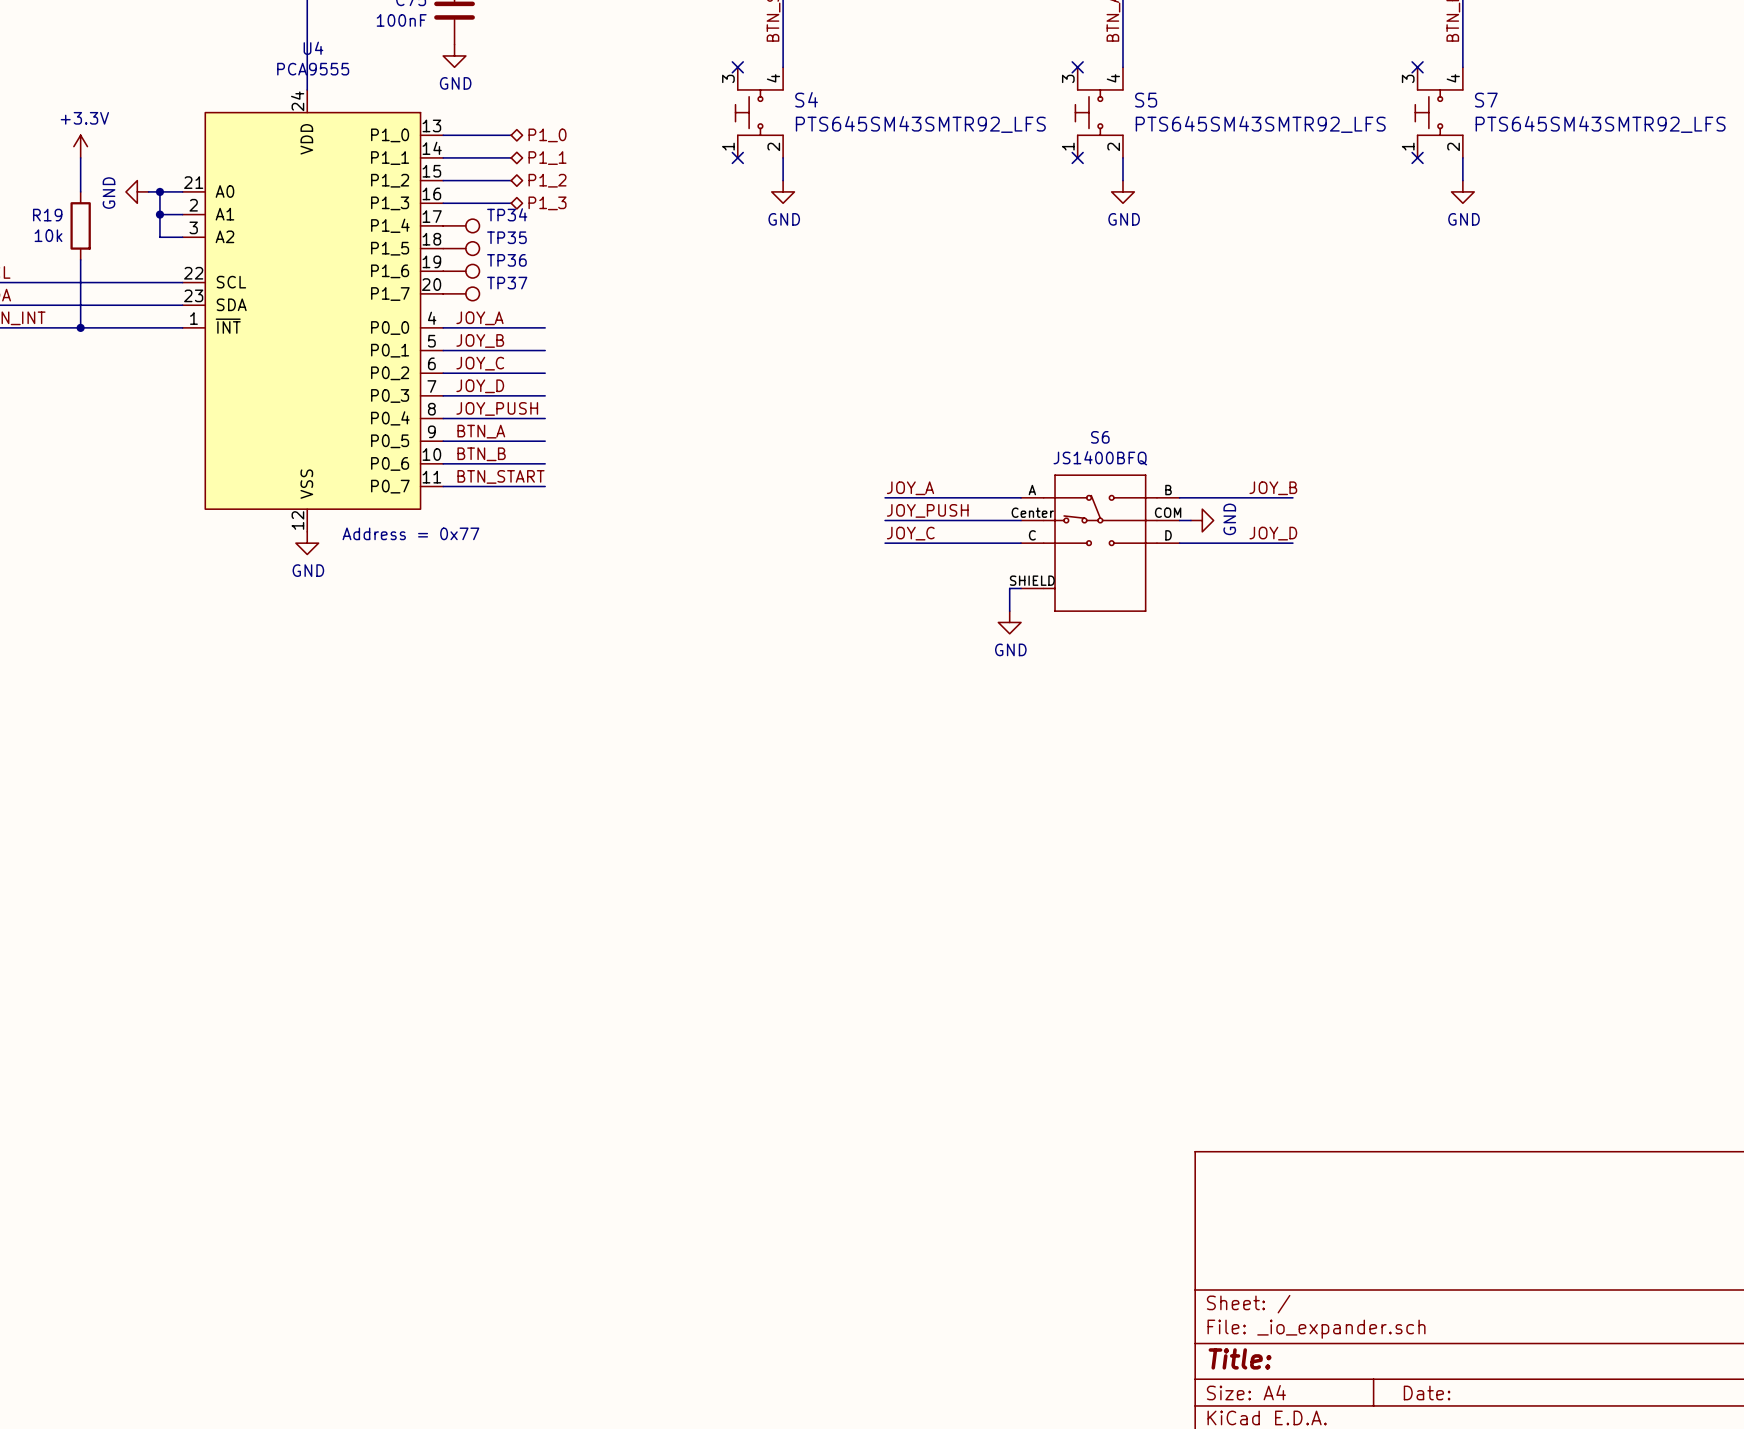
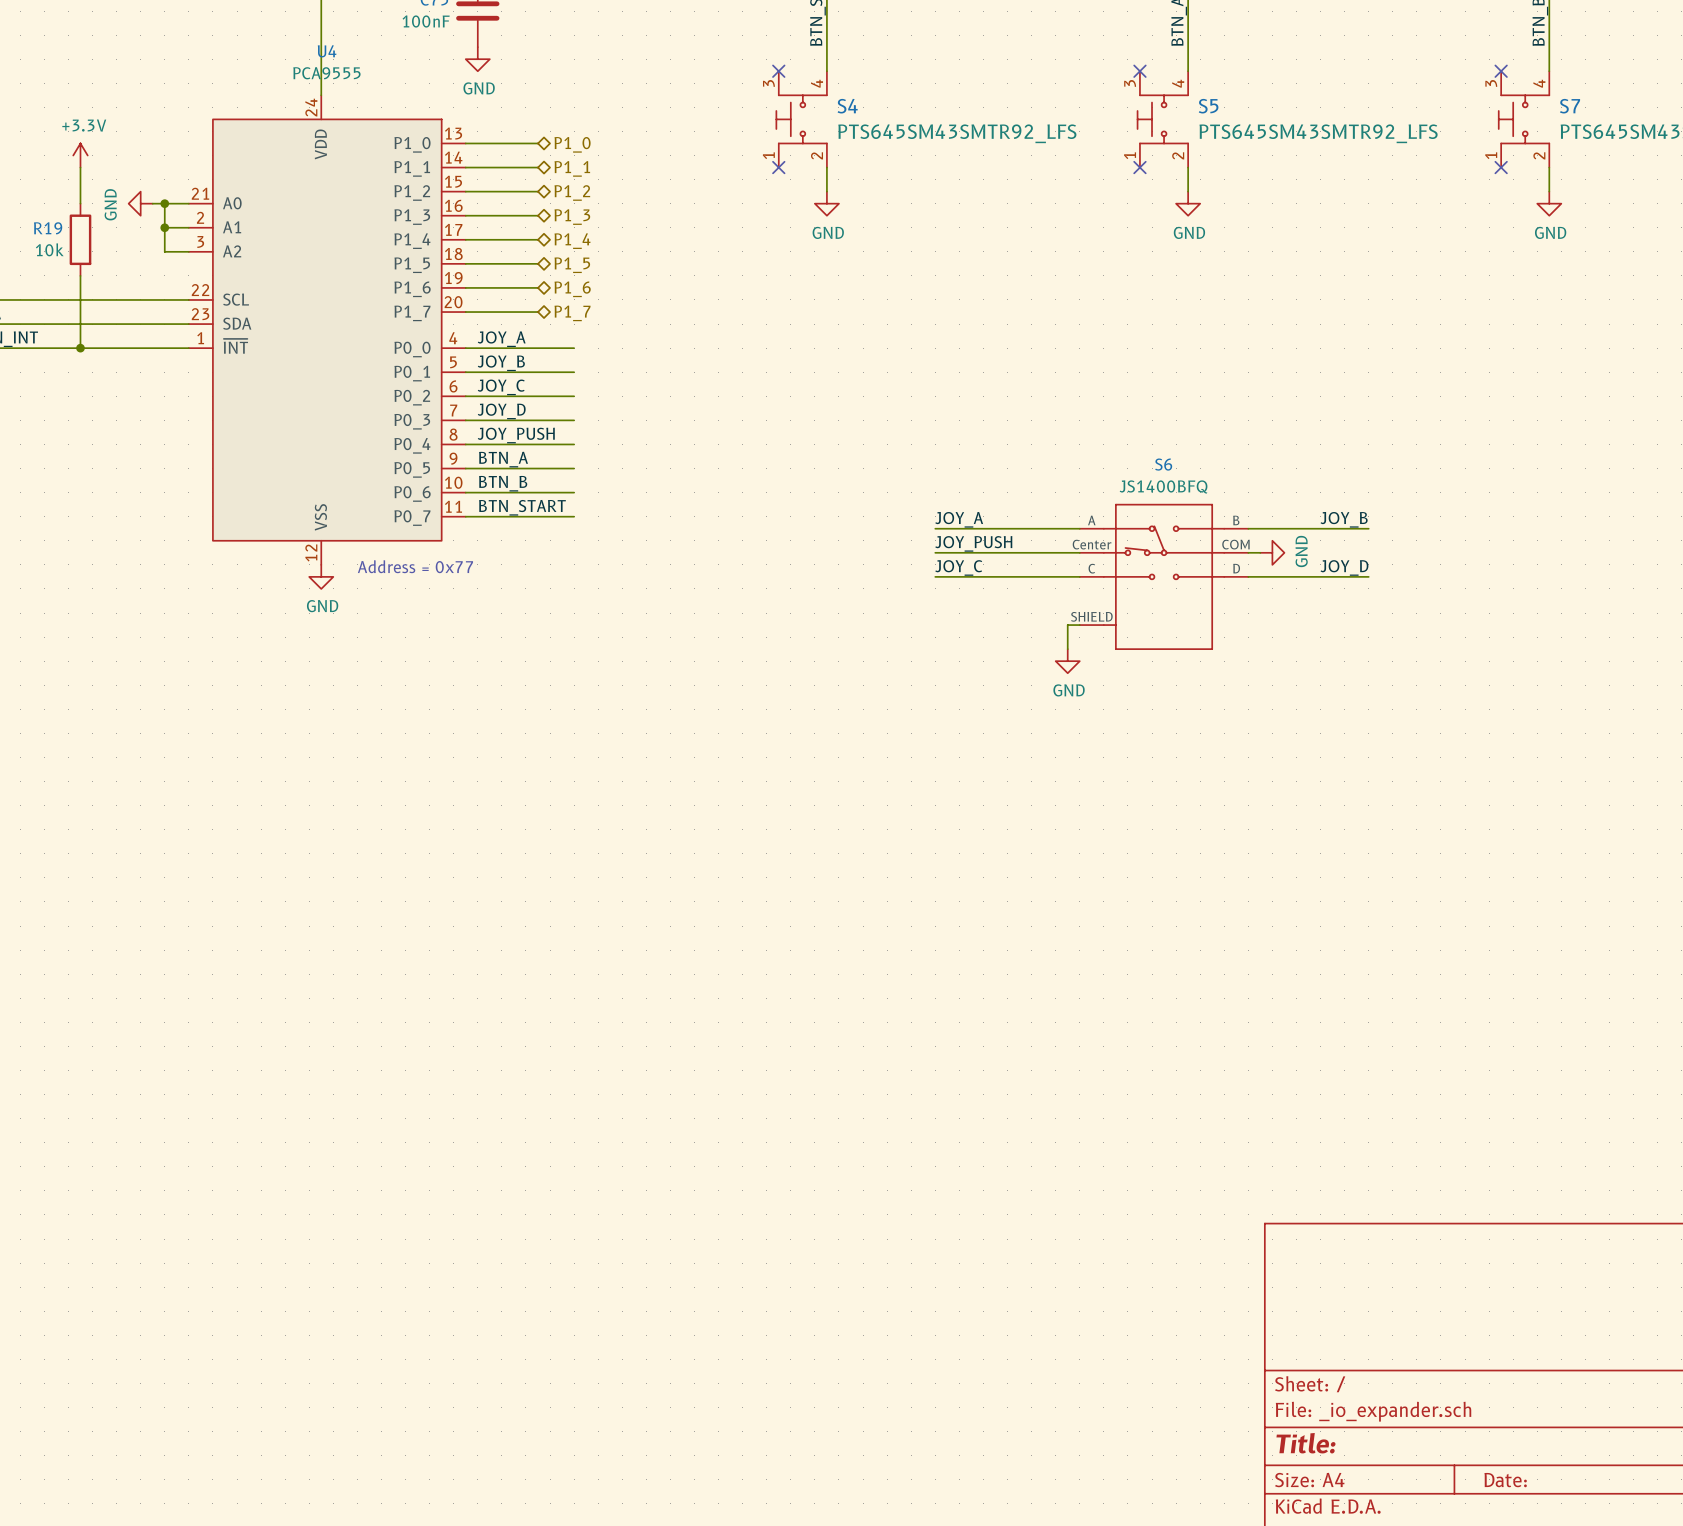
wire: none -> (465, 239) (537, 239)
TP34: (461, 225) -> none
hierarchical label: none -> P1_4 (572, 241)
wire: none -> (465, 263) (537, 263)
TP35: (461, 248) -> none
hierarchical label: none -> P1_5 (572, 265)
wire: none -> (465, 287) (537, 287)
TP36: (461, 271) -> none
hierarchical label: none -> P1_6 (572, 289)
wire: none -> (465, 312) (537, 312)
TP37: (461, 293) -> none
hierarchical label: none -> P1_7 (572, 313)

